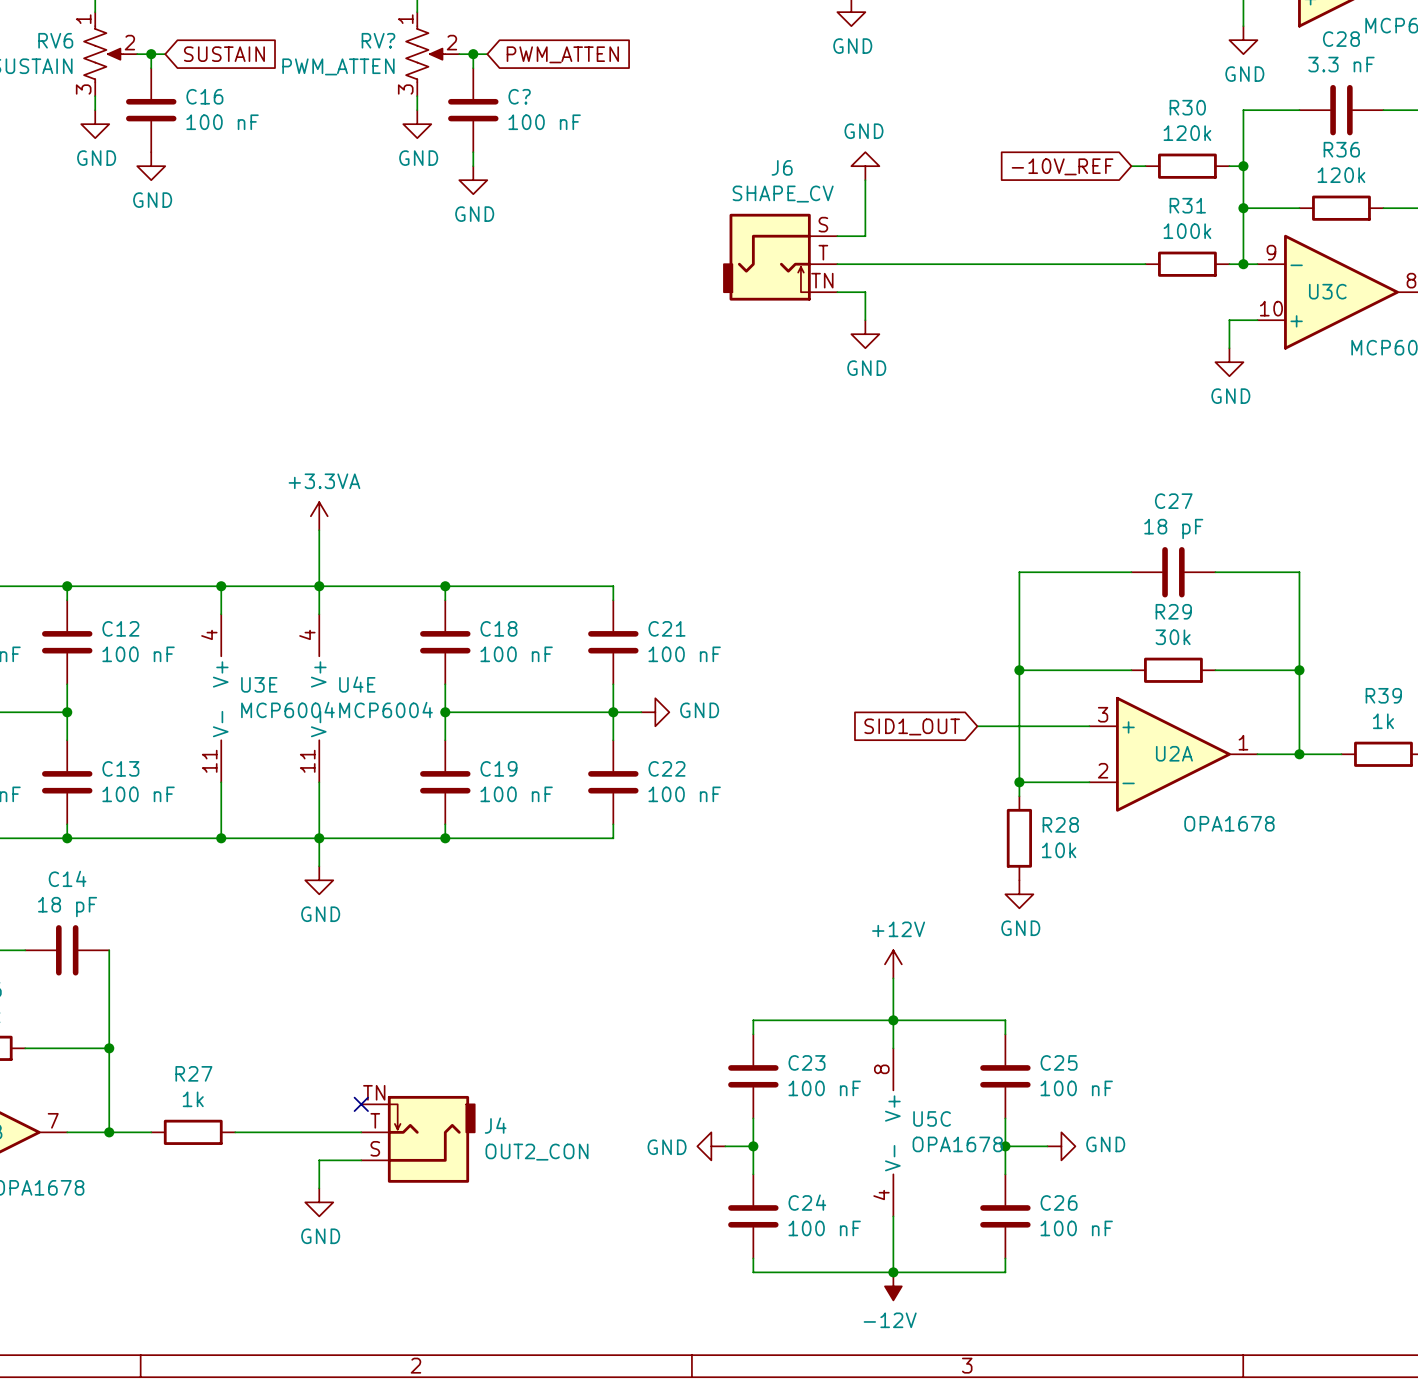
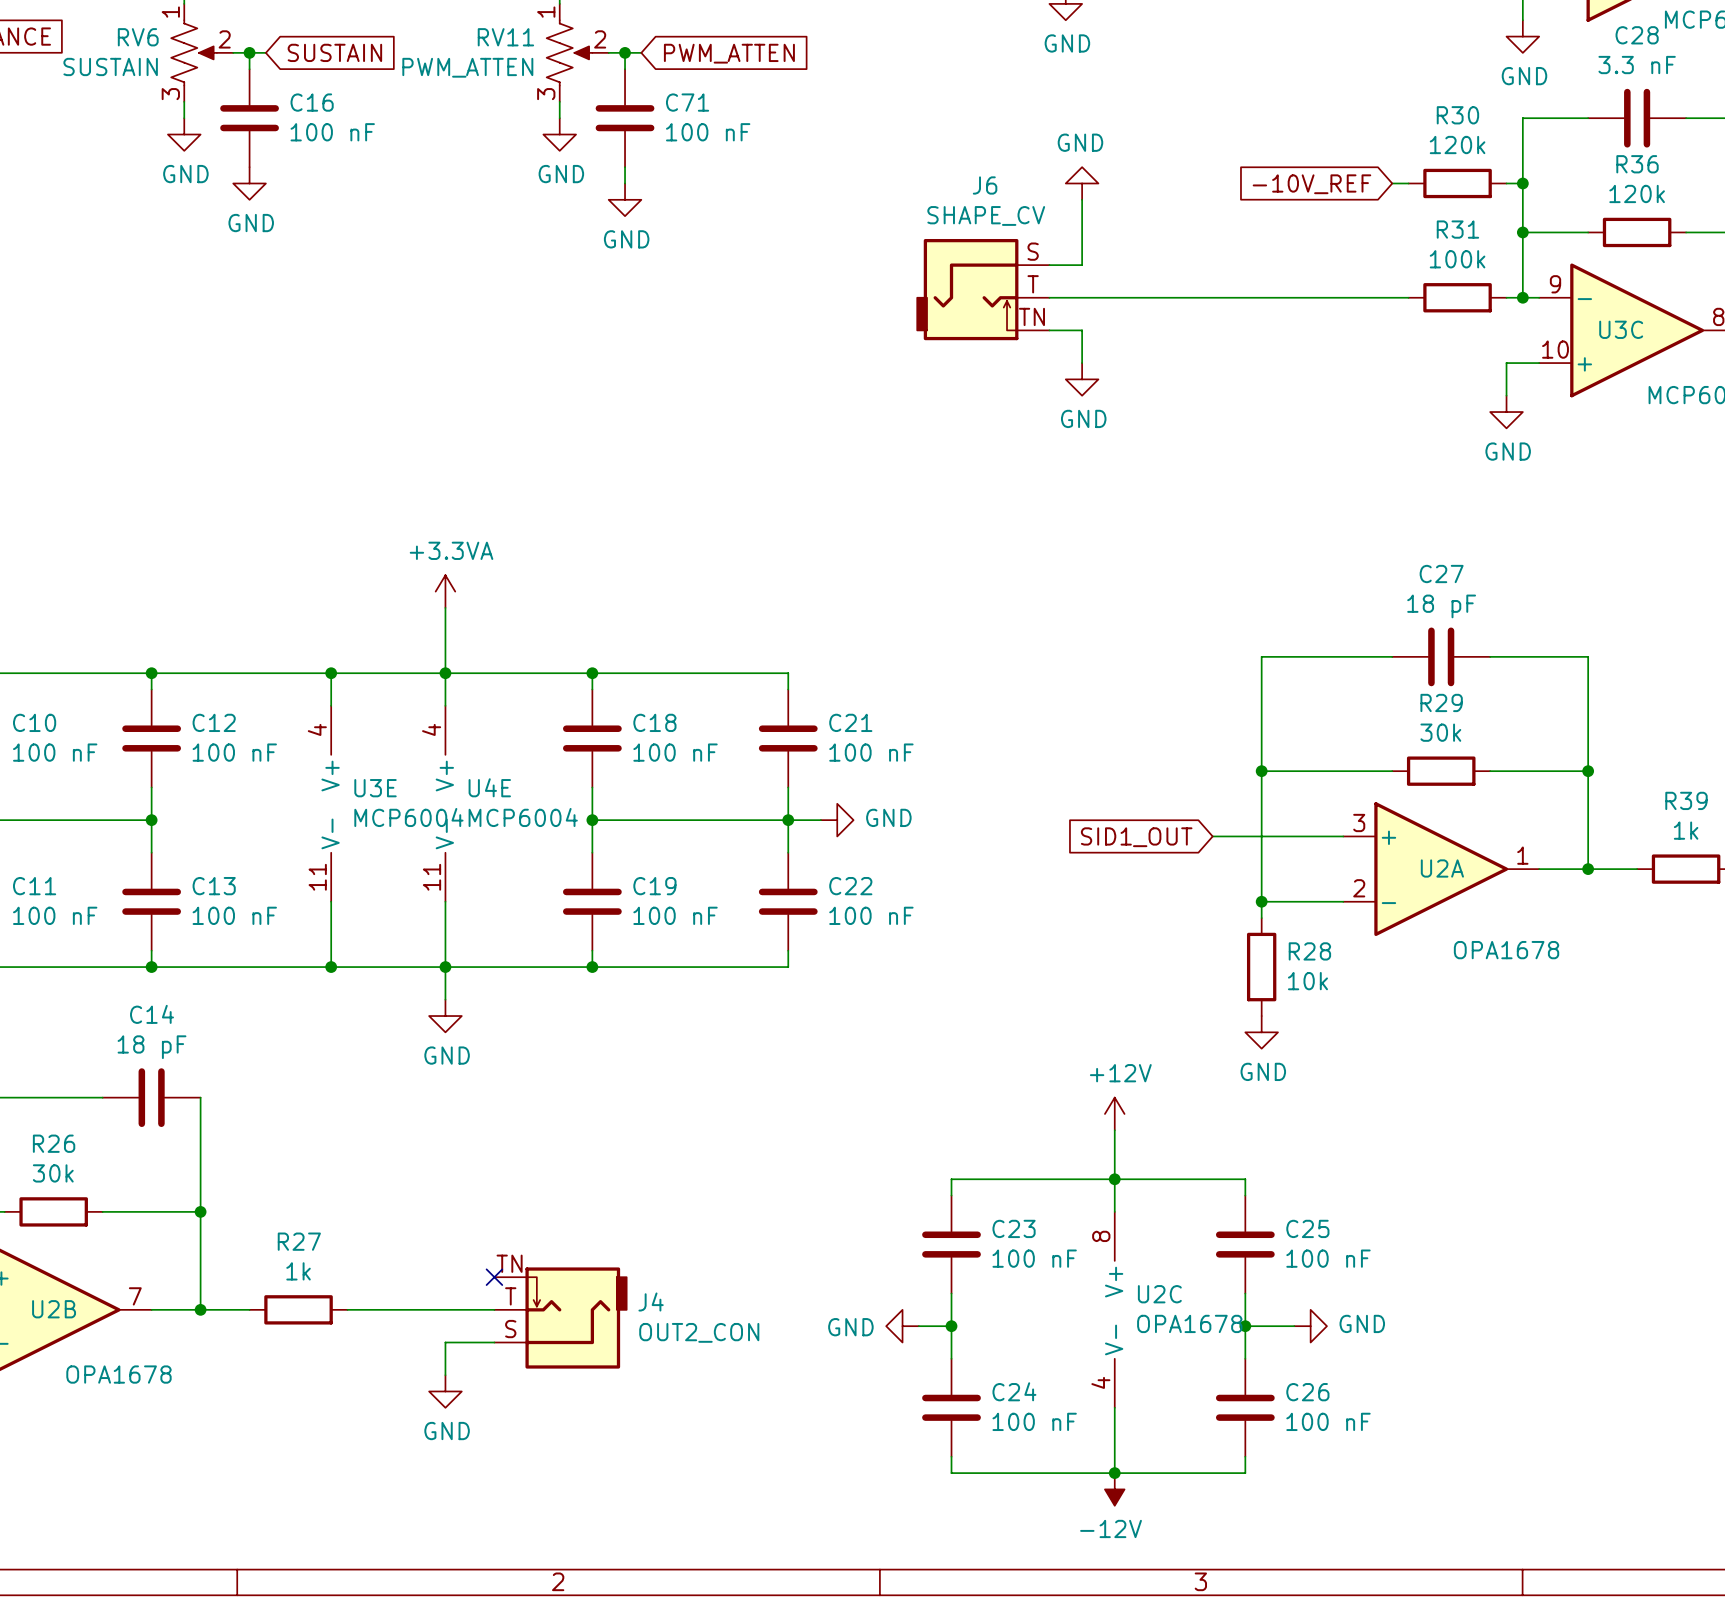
RV? name: RV? (378, 40) -> RV11 (505, 37)
C? name: C? (519, 96) -> C71 (687, 102)
U5C name: U5C (932, 1118) -> U2C (1159, 1294)

